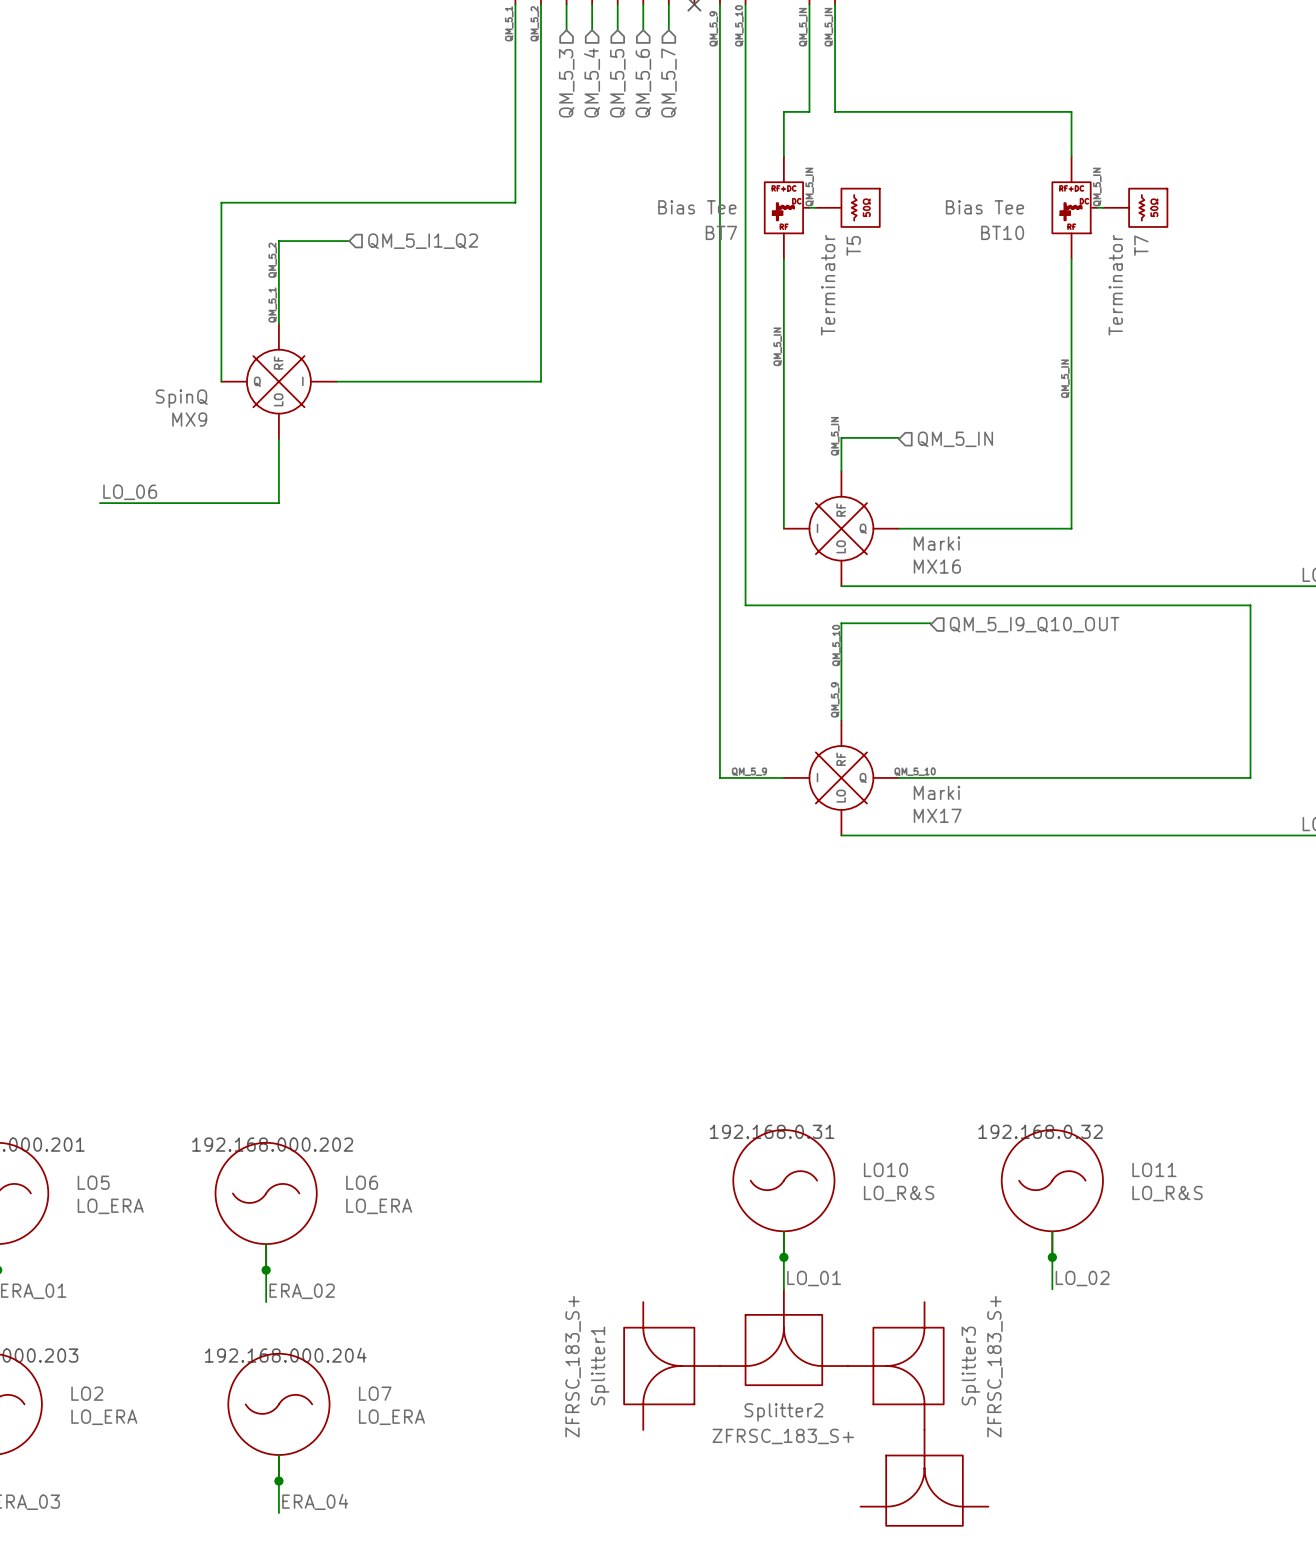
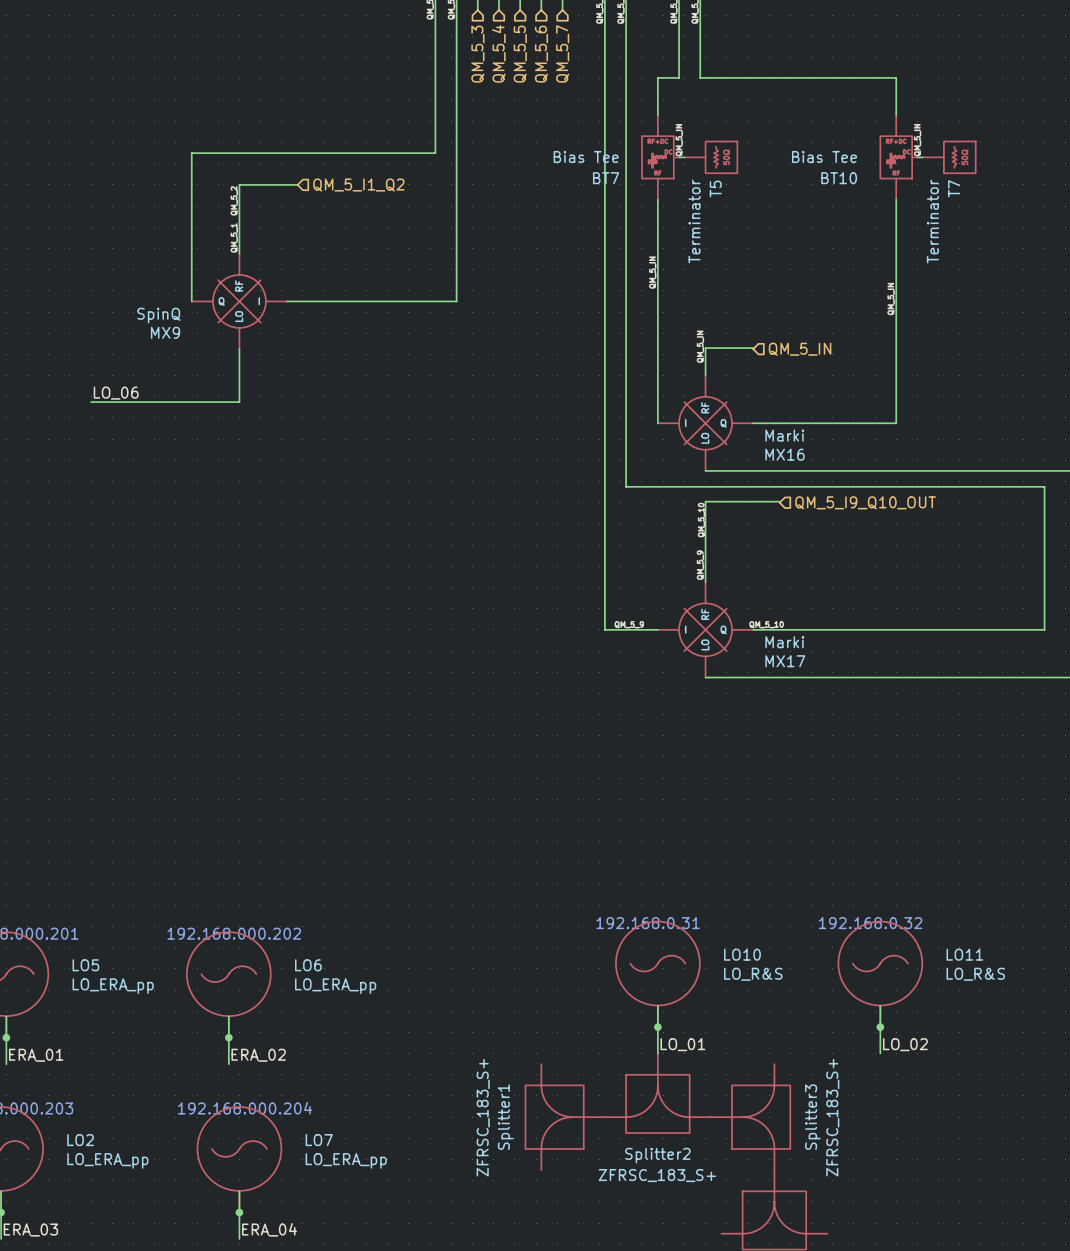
LO5 value: LO_ERA (110, 1206) -> LO_ERA_pp (113, 986)
LO6 value: LO_ERA (379, 1206) -> LO_ERA_pp (335, 986)
LO2 value: LO_ERA (104, 1417) -> LO_ERA_pp (107, 1160)
LO7 value: LO_ERA (391, 1417) -> LO_ERA_pp (346, 1160)

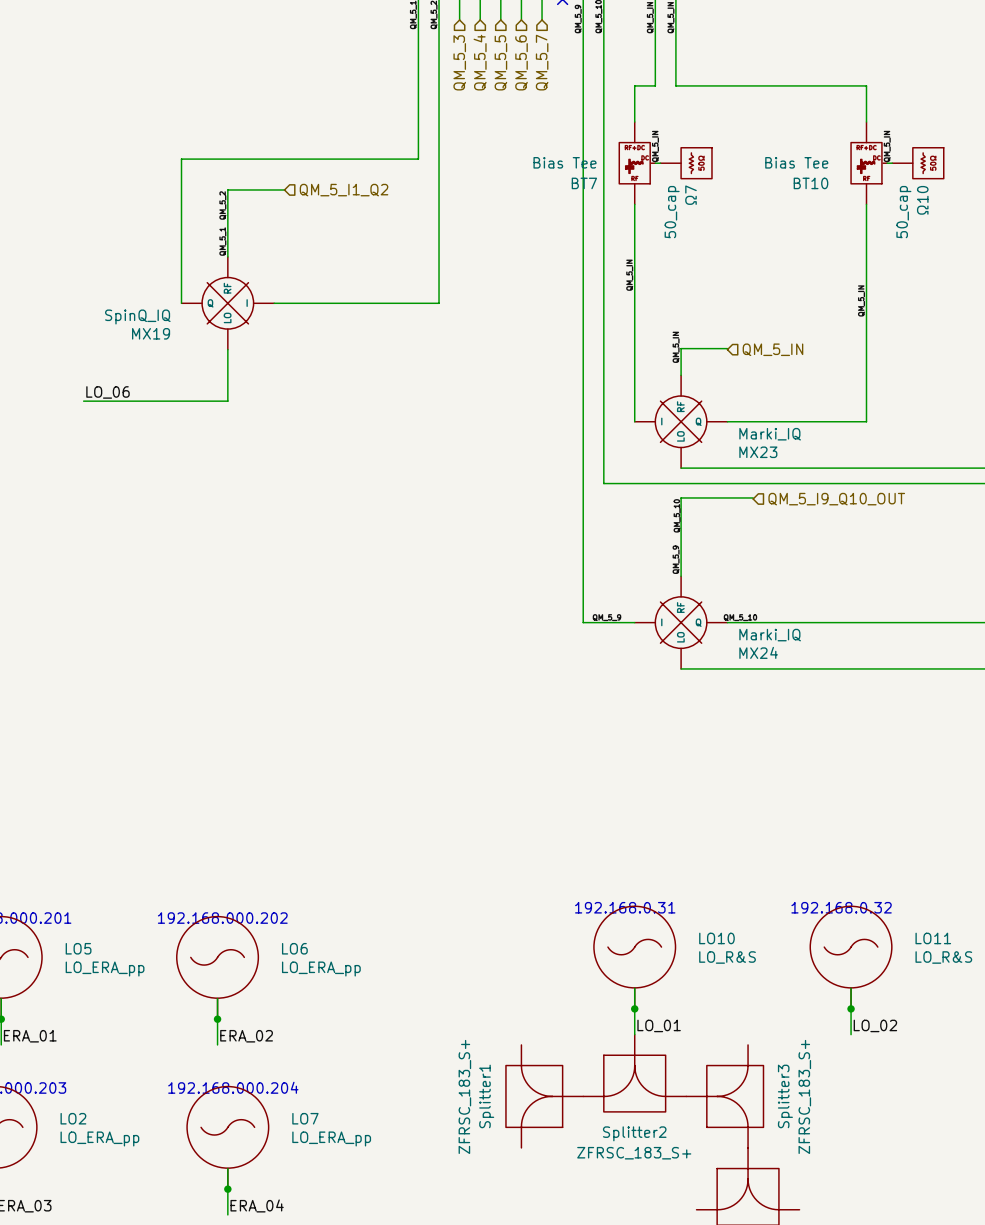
T5 name: T5 (715, 188) -> Ω7 (691, 195)
T7 name: T7 (954, 188) -> Ω10 (922, 200)
T5 value: Terminator (694, 221) -> 50_cap (672, 212)
T7 value: Terminator (932, 221) -> 50_cap (903, 212)
MX9 value: SpinQ (158, 315) -> SpinQ_IQ (137, 316)
MX9 name: MX9 (165, 332) -> MX19 (151, 333)
MX16 value: Marki (784, 435) -> Marki_IQ (770, 434)
MX16 name: MX16 (785, 454) -> MX23 (758, 452)
MX17 value: Marki (784, 642) -> Marki_IQ (770, 635)
MX17 name: MX17 (785, 661) -> MX24 (758, 652)

